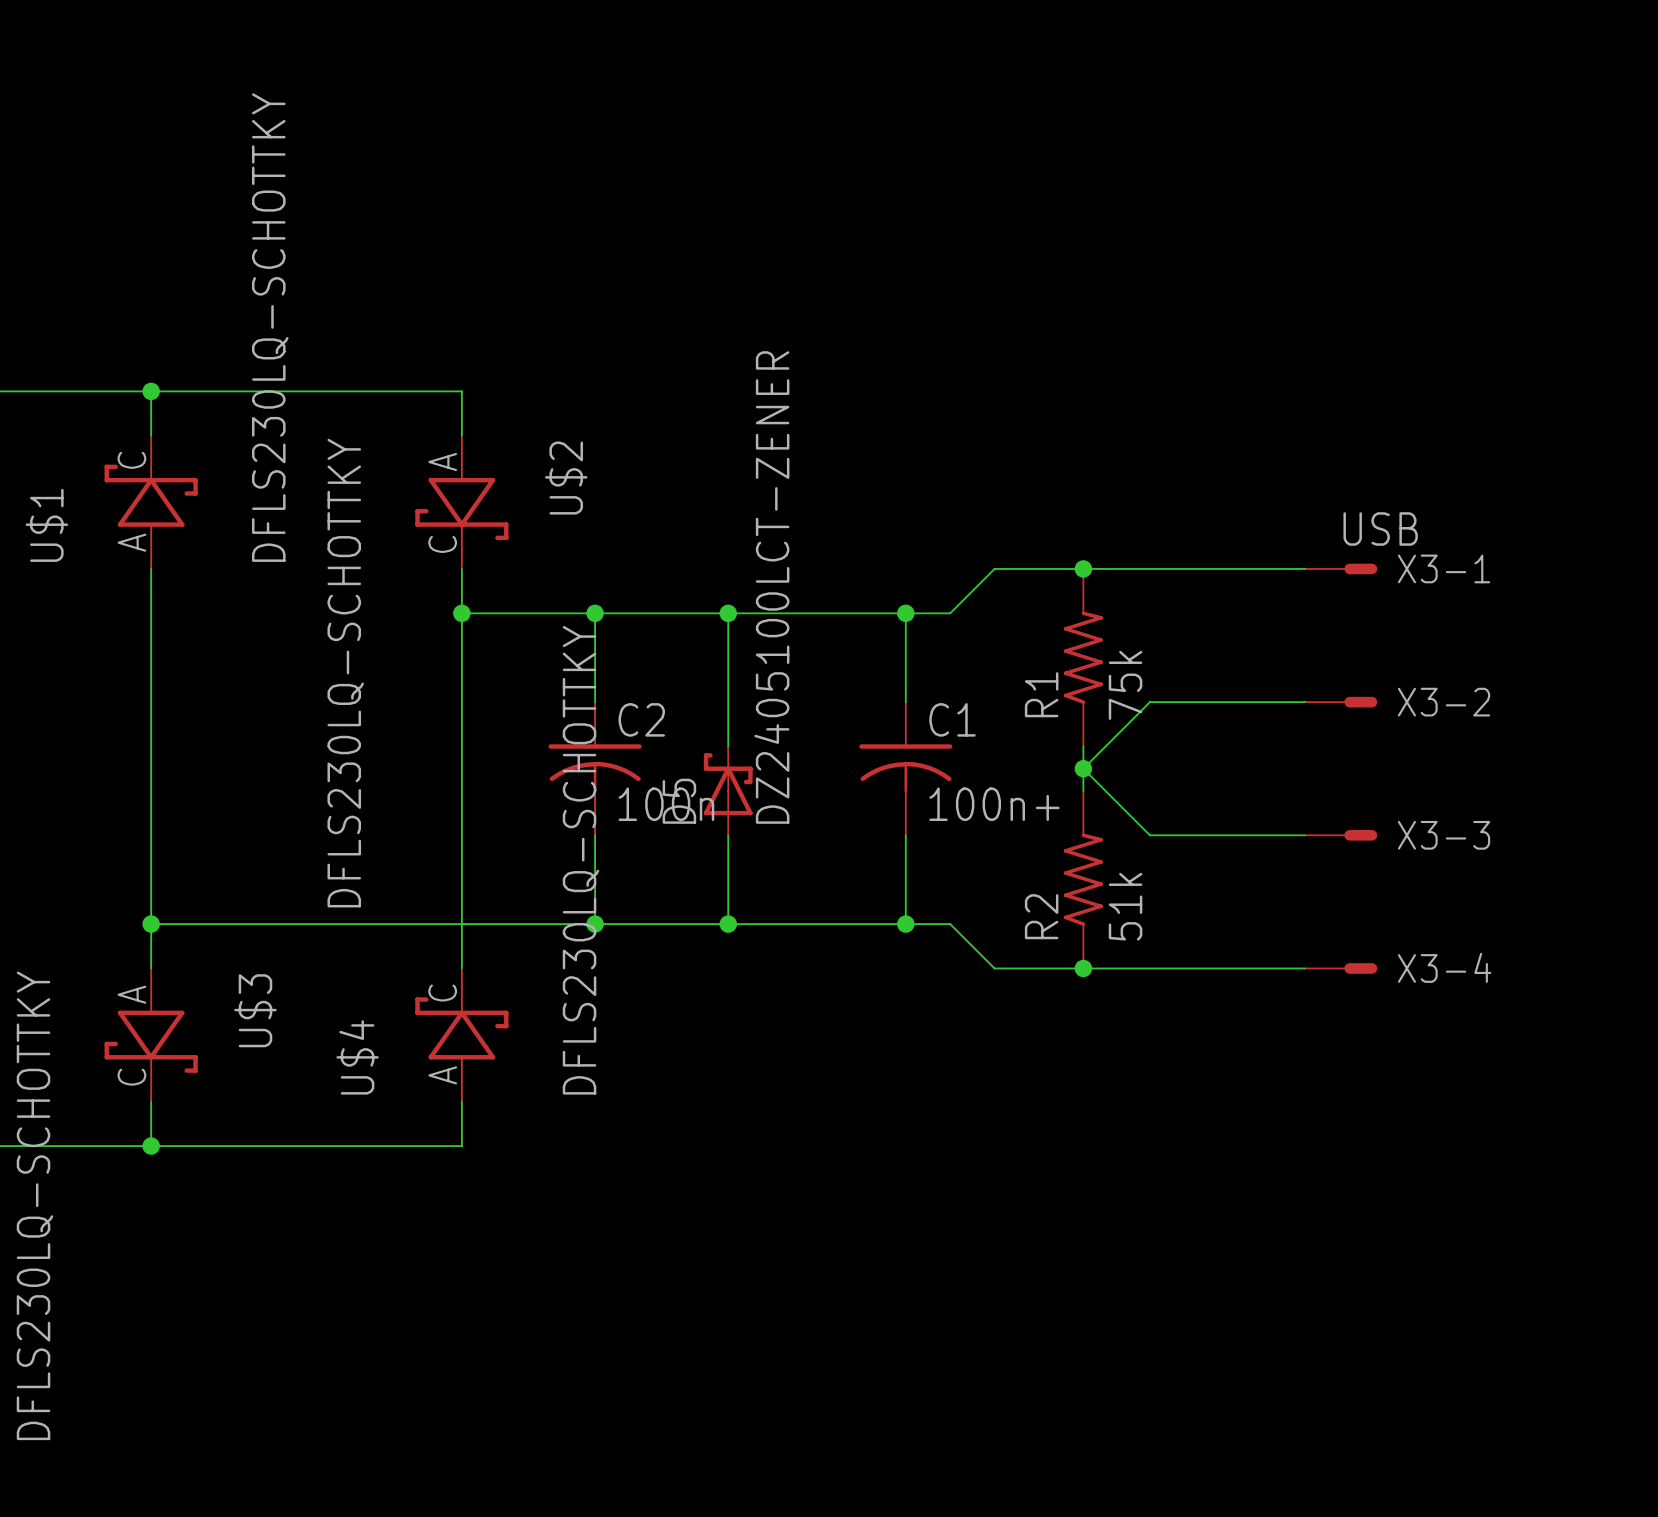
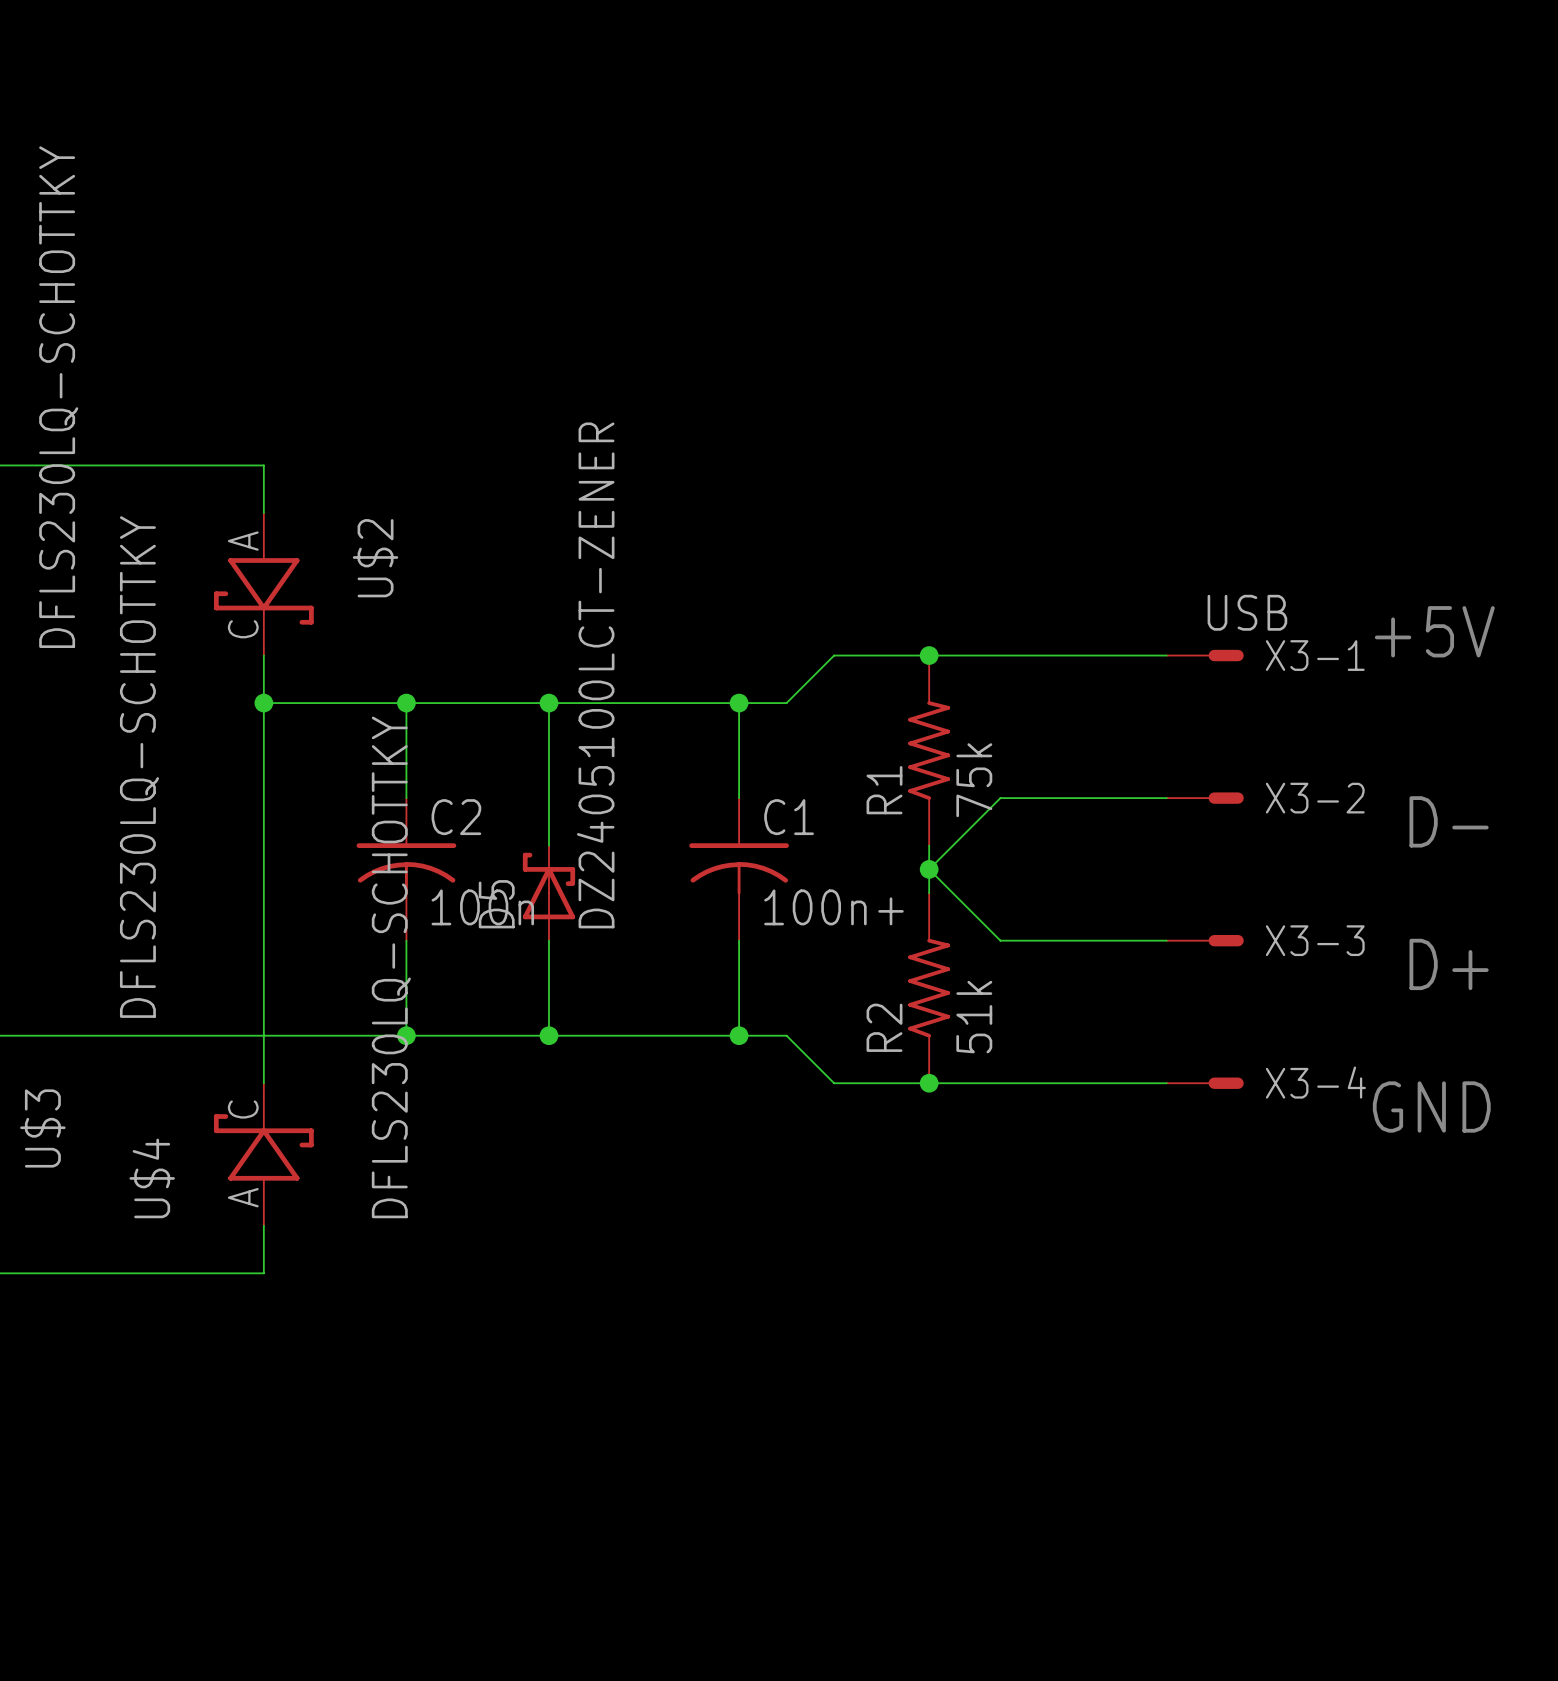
text: none -> +5V (1434, 631)
text: none -> D- (1449, 821)
text: none -> D+ (1449, 964)
text: none -> GND (1431, 1107)

